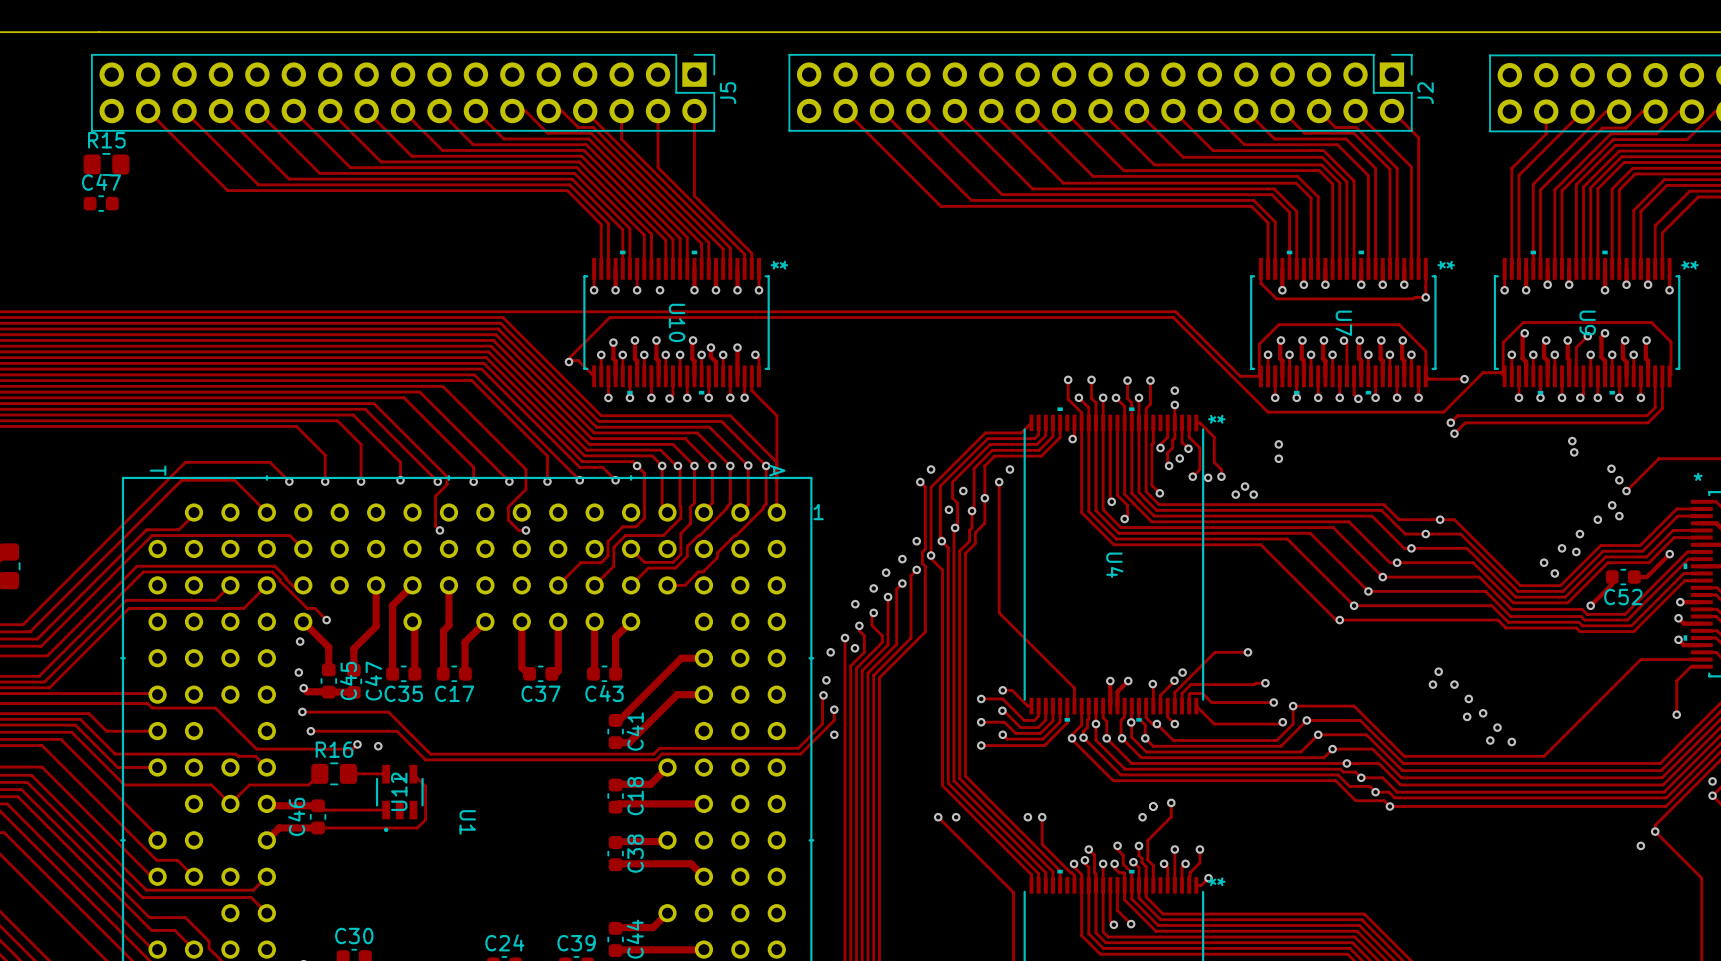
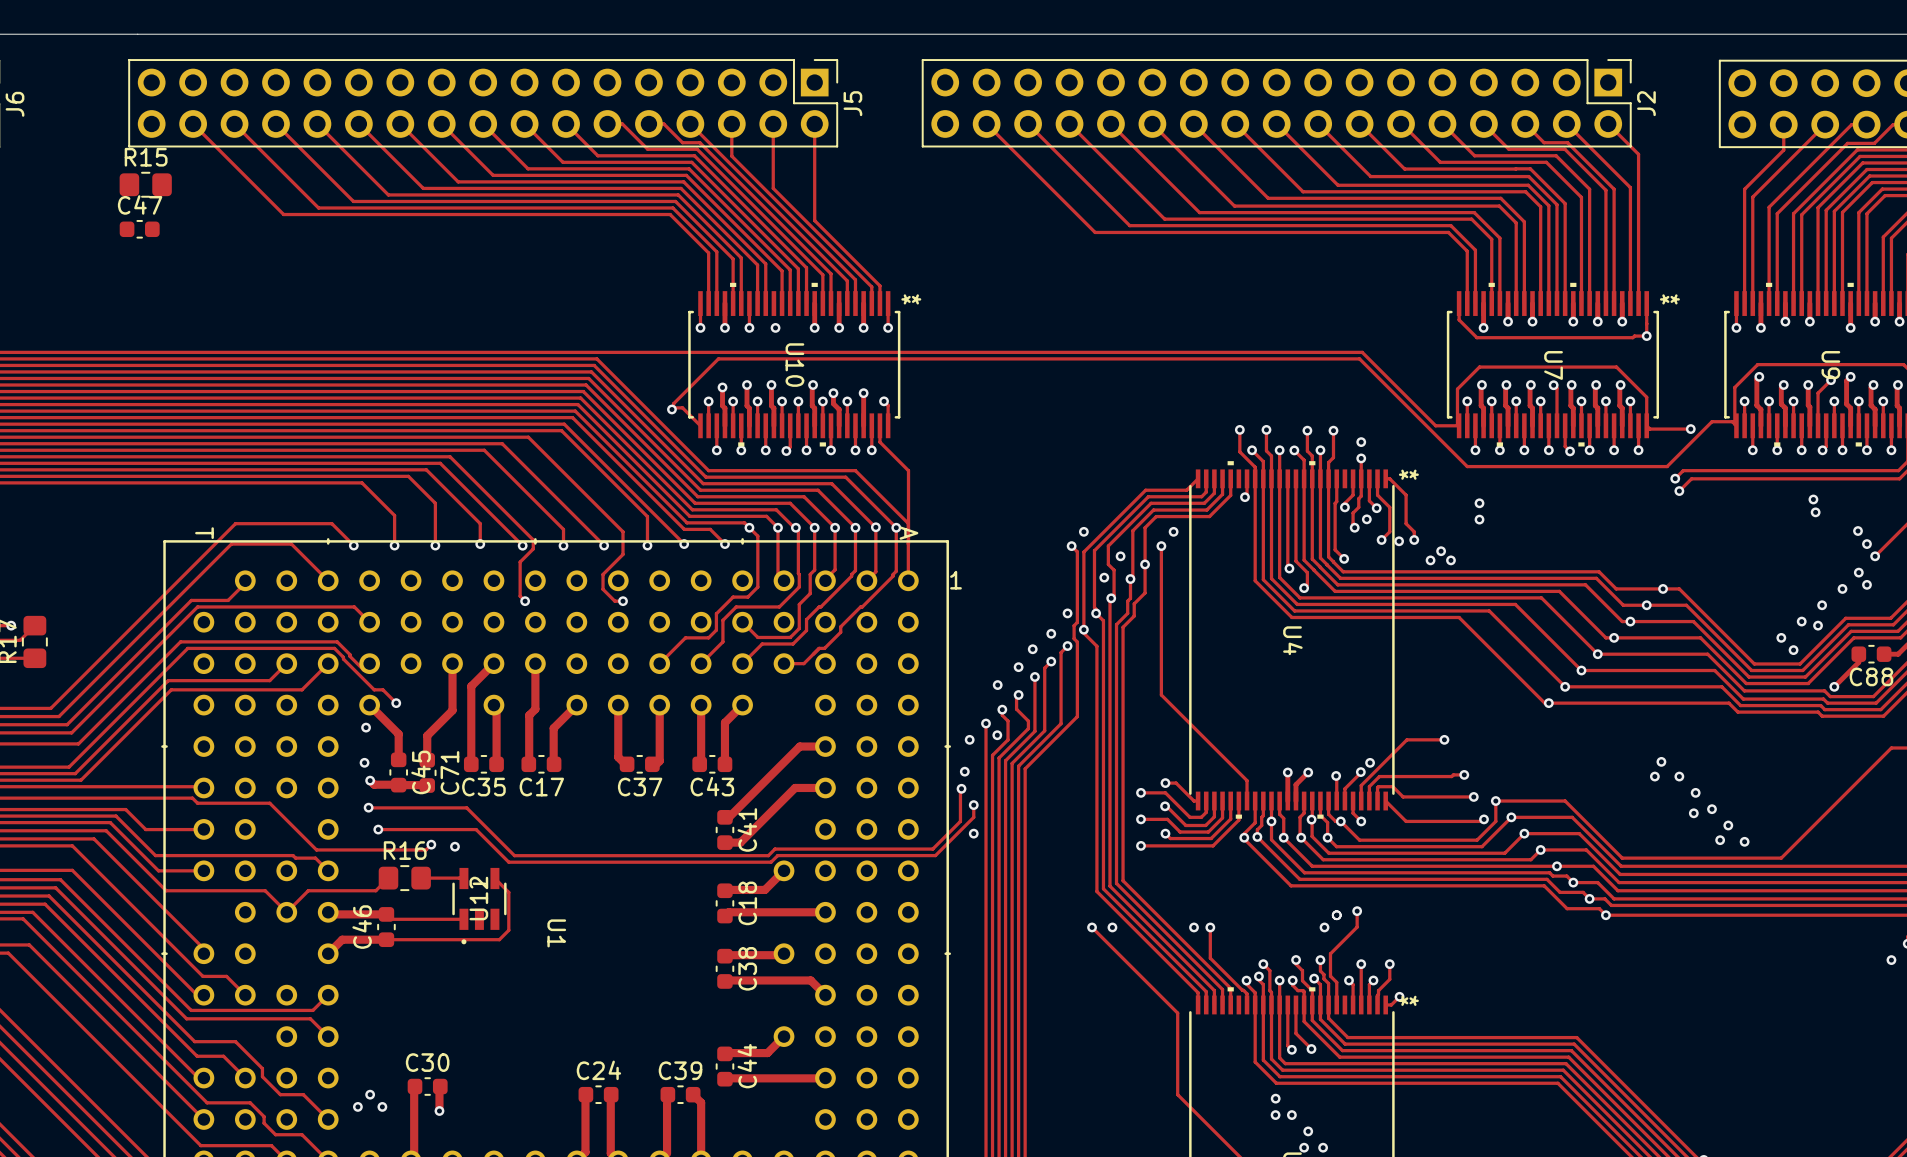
C52 name: C52 (1623, 597) -> C88 (1871, 676)
C47 name: C47 (373, 681) -> C71 (449, 772)

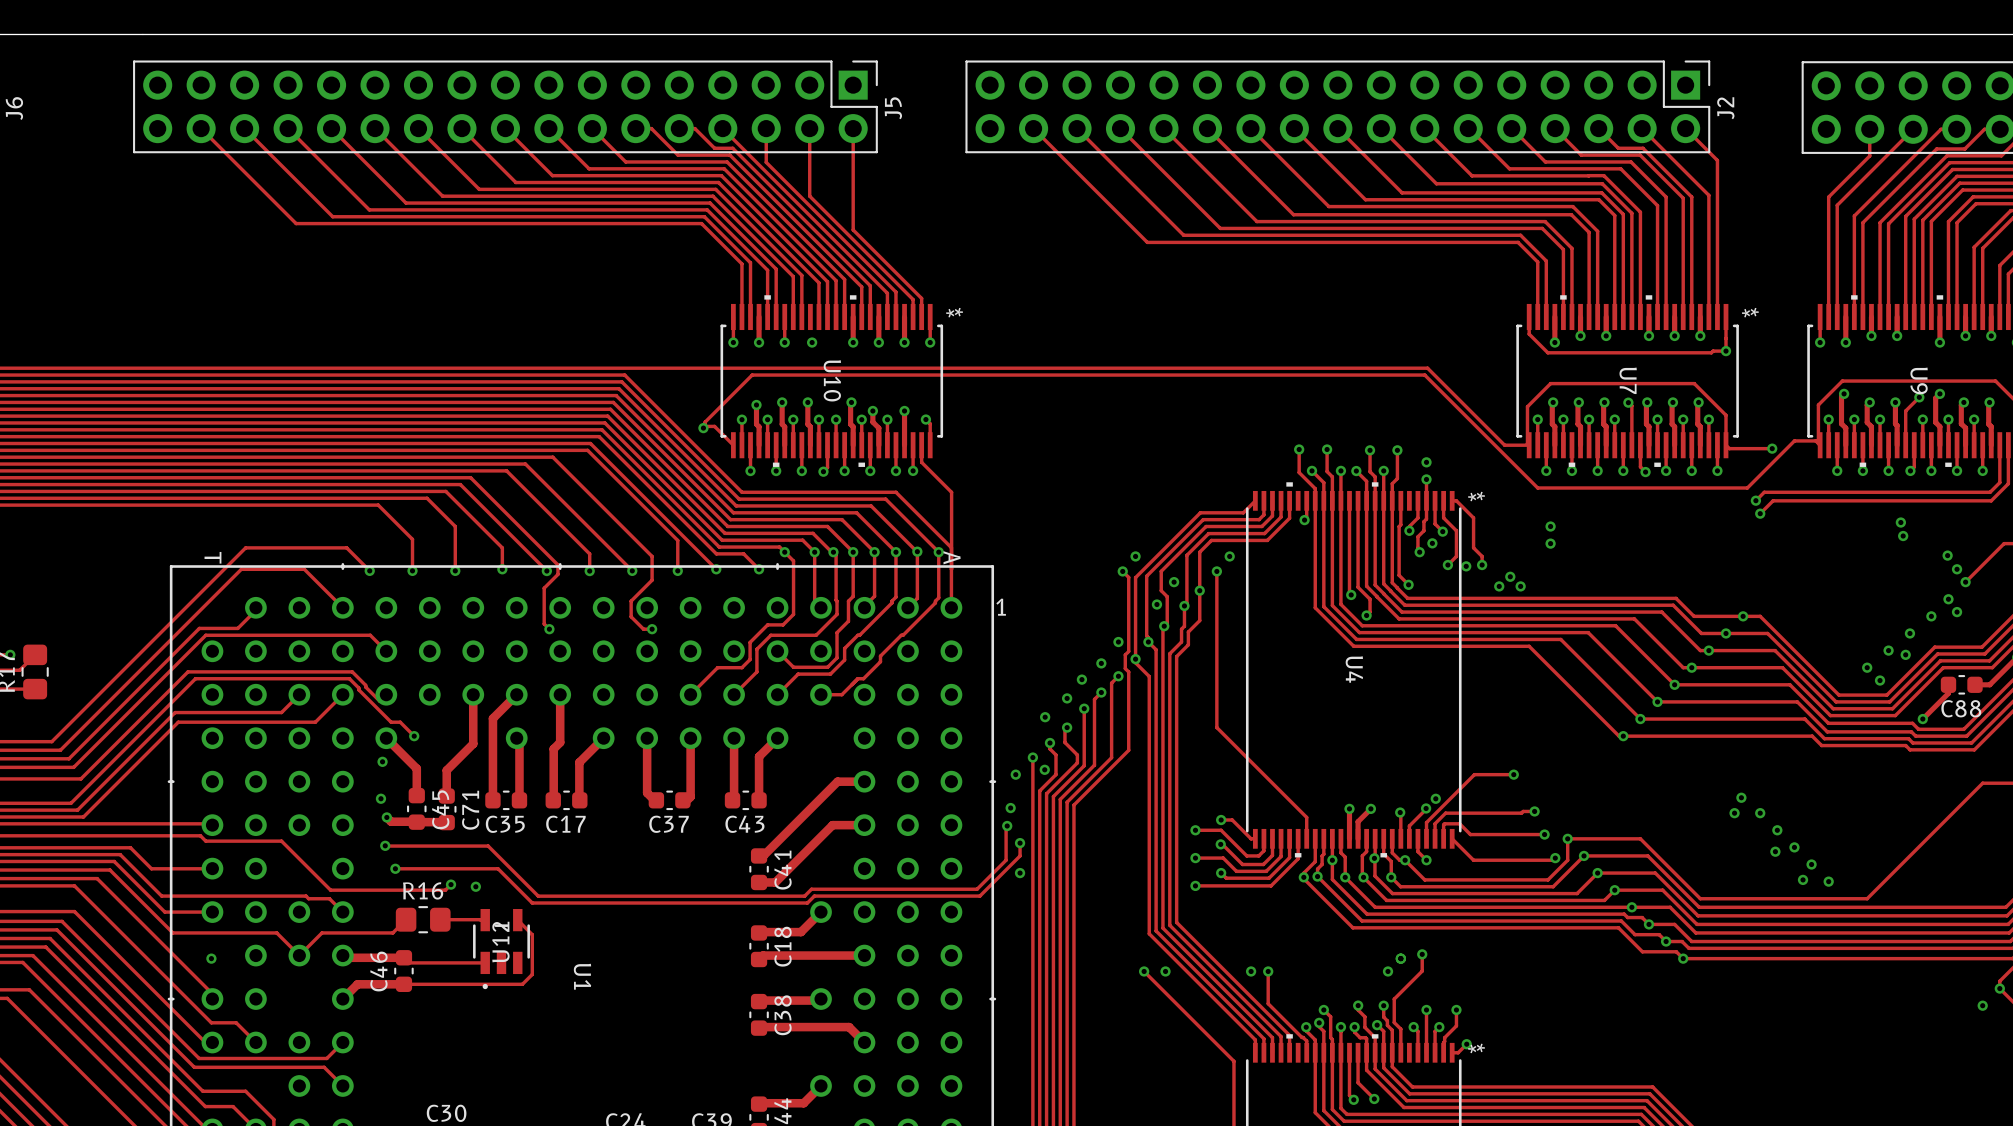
R15: (145, 184) -> none
C47: (139, 229) -> none
via: none -> (211, 958)

